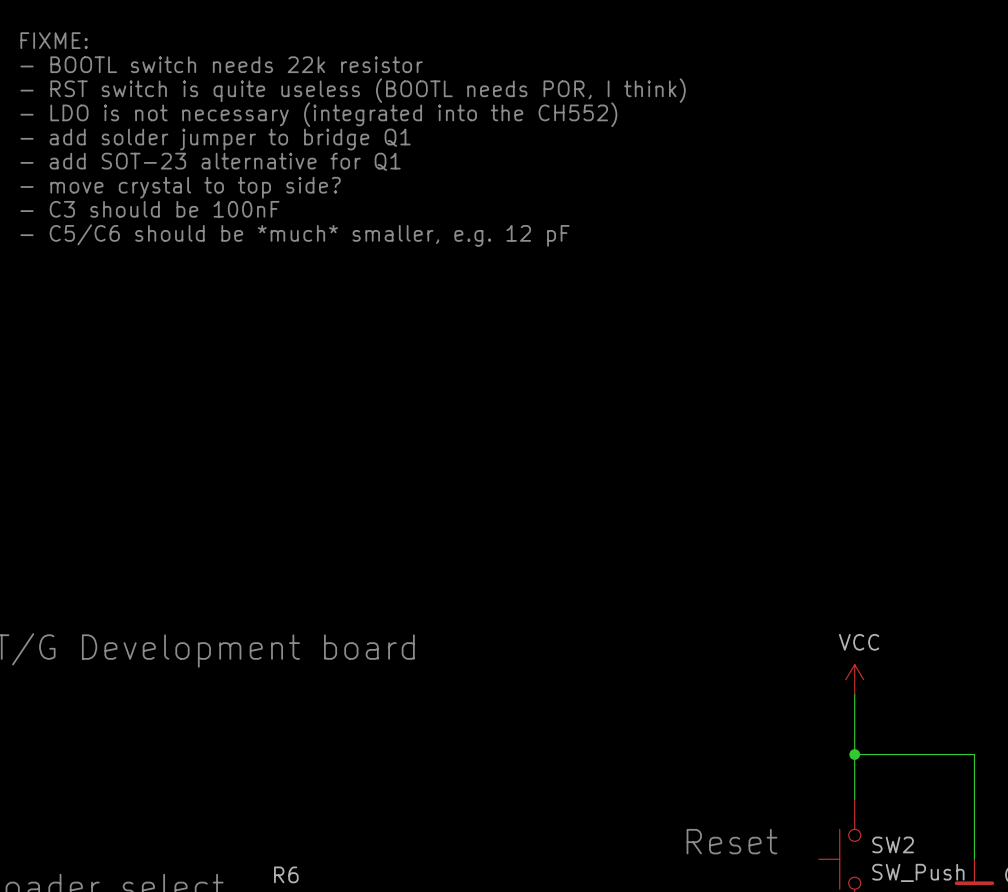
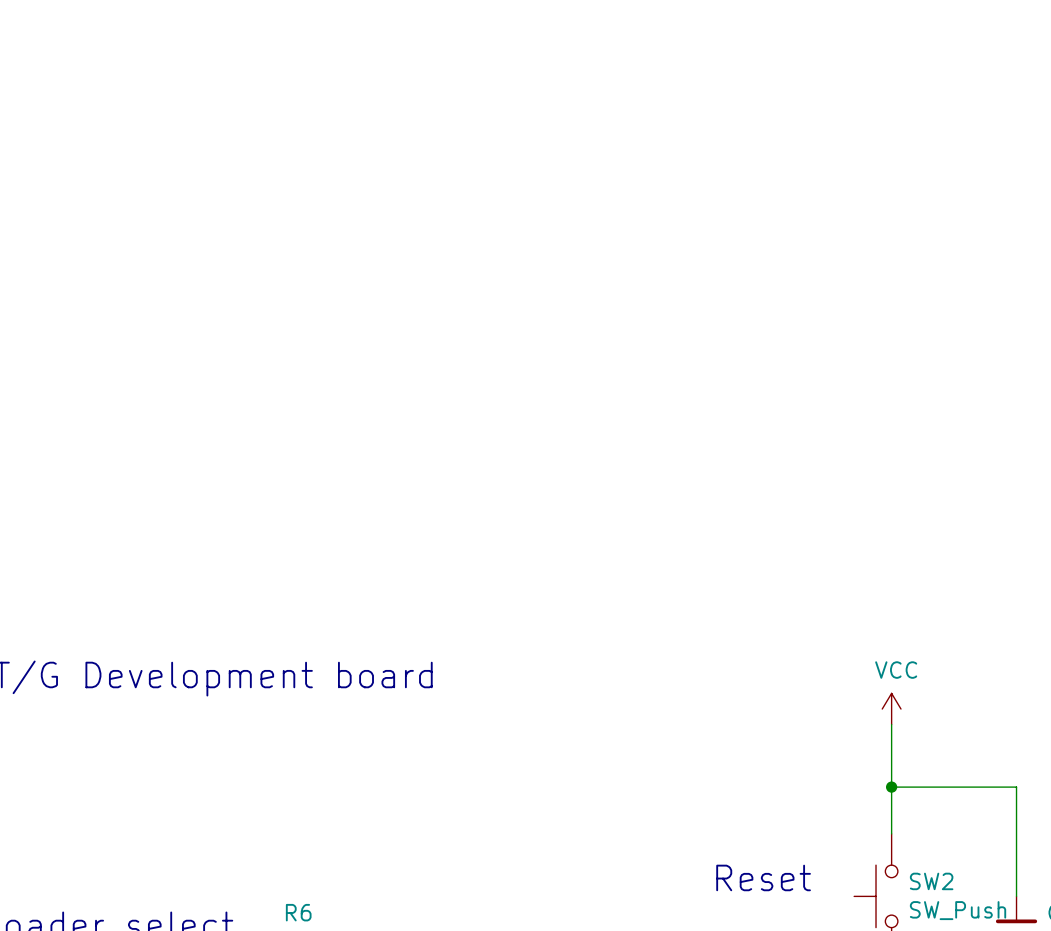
text: FIXME: (54, 40) -> none
text: - BOOTL switch needs 22k resistor (221, 64) -> none
text: - RST switch is quite useless (BOOTL needs POR, I think) (353, 90) -> none
text: - LDO is not necessary (integrated into the CH552) (318, 114) -> none
text: - add solder jumper to bridge Q1 (215, 139) -> none
text: - add SOT-23 alternative for Q1 (210, 161) -> none
text: - move crystal to top side? (180, 187) -> none
text: - C3 should be 100nF (149, 209) -> none
text: - C5/C6 should be *much* smaller, e.g. 12 pF (295, 235) -> none

